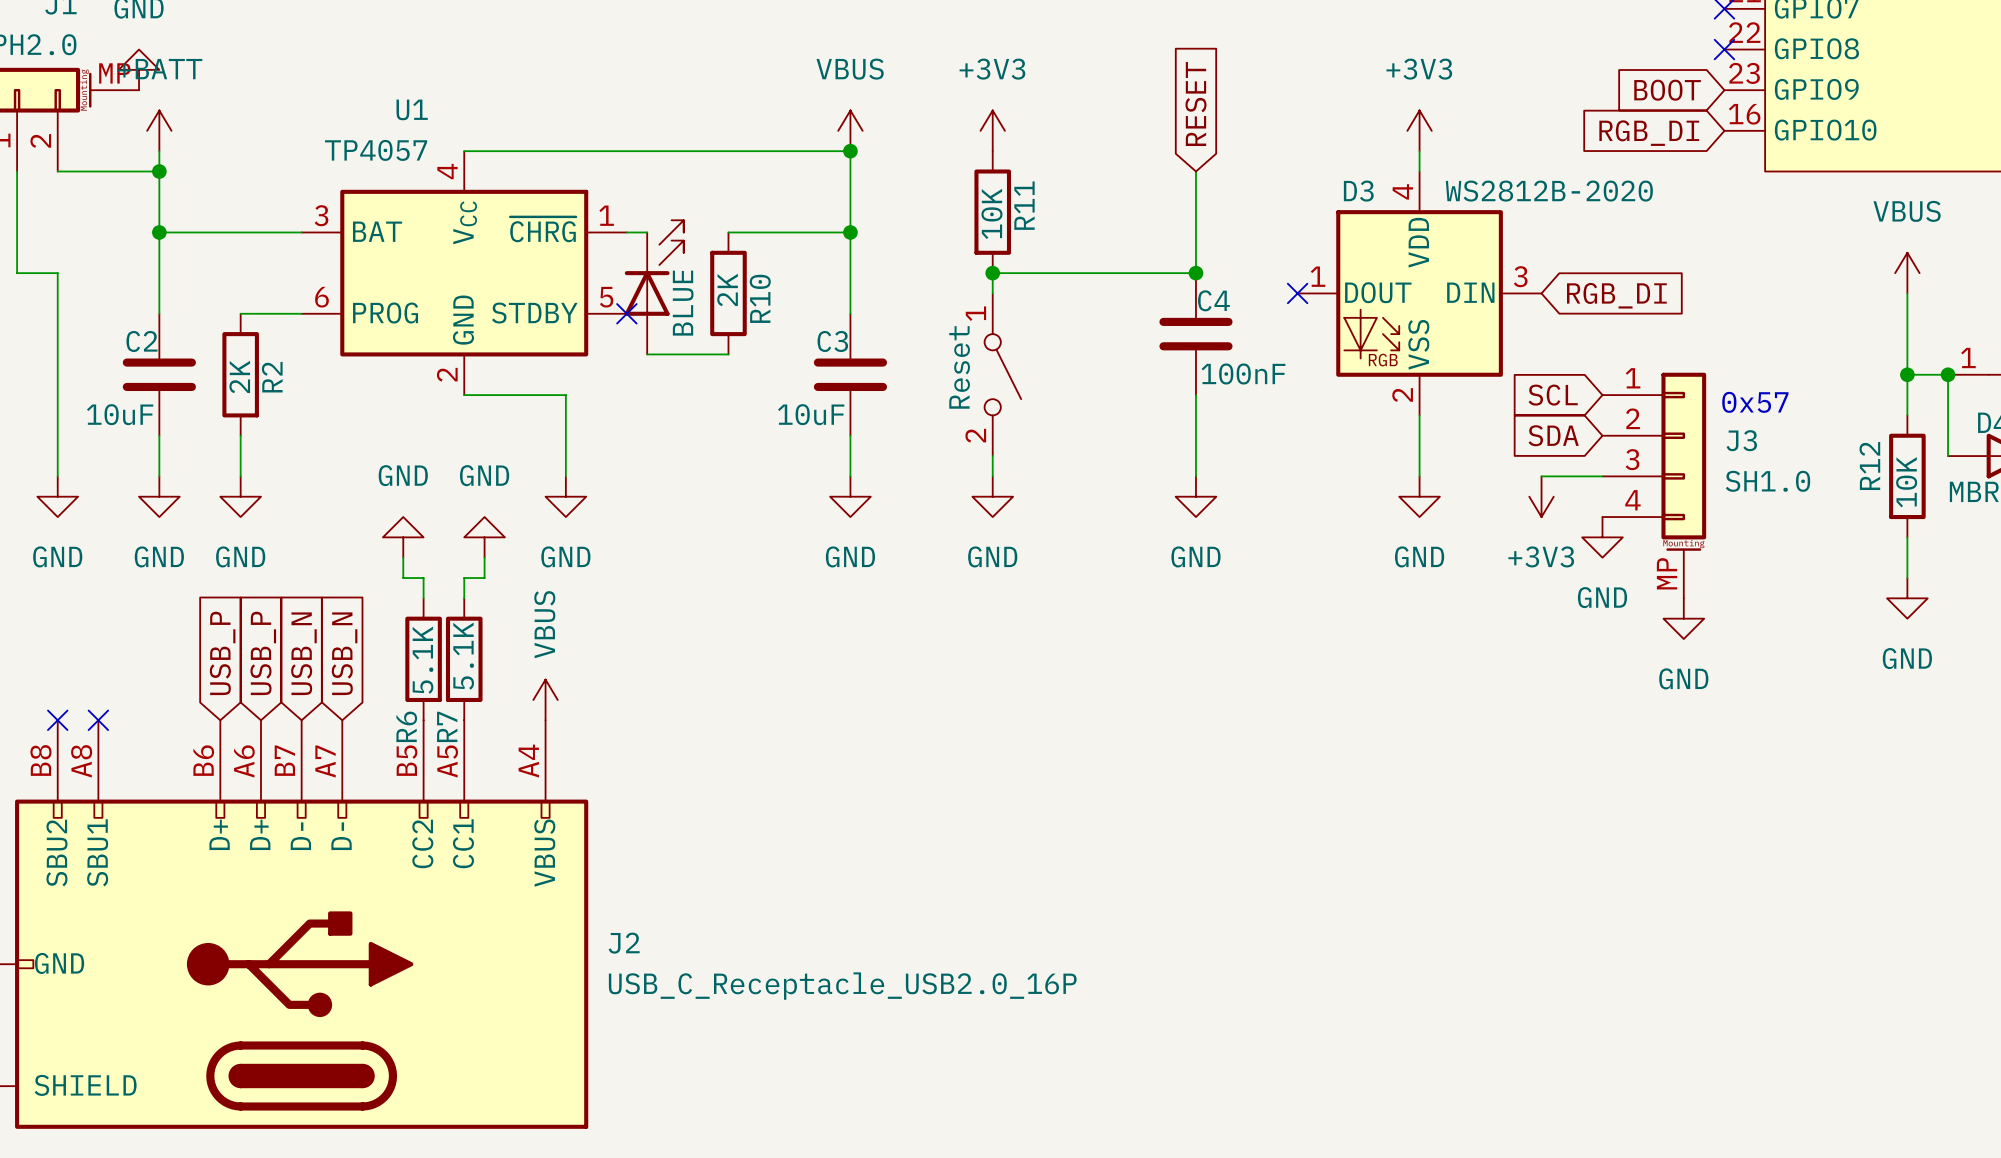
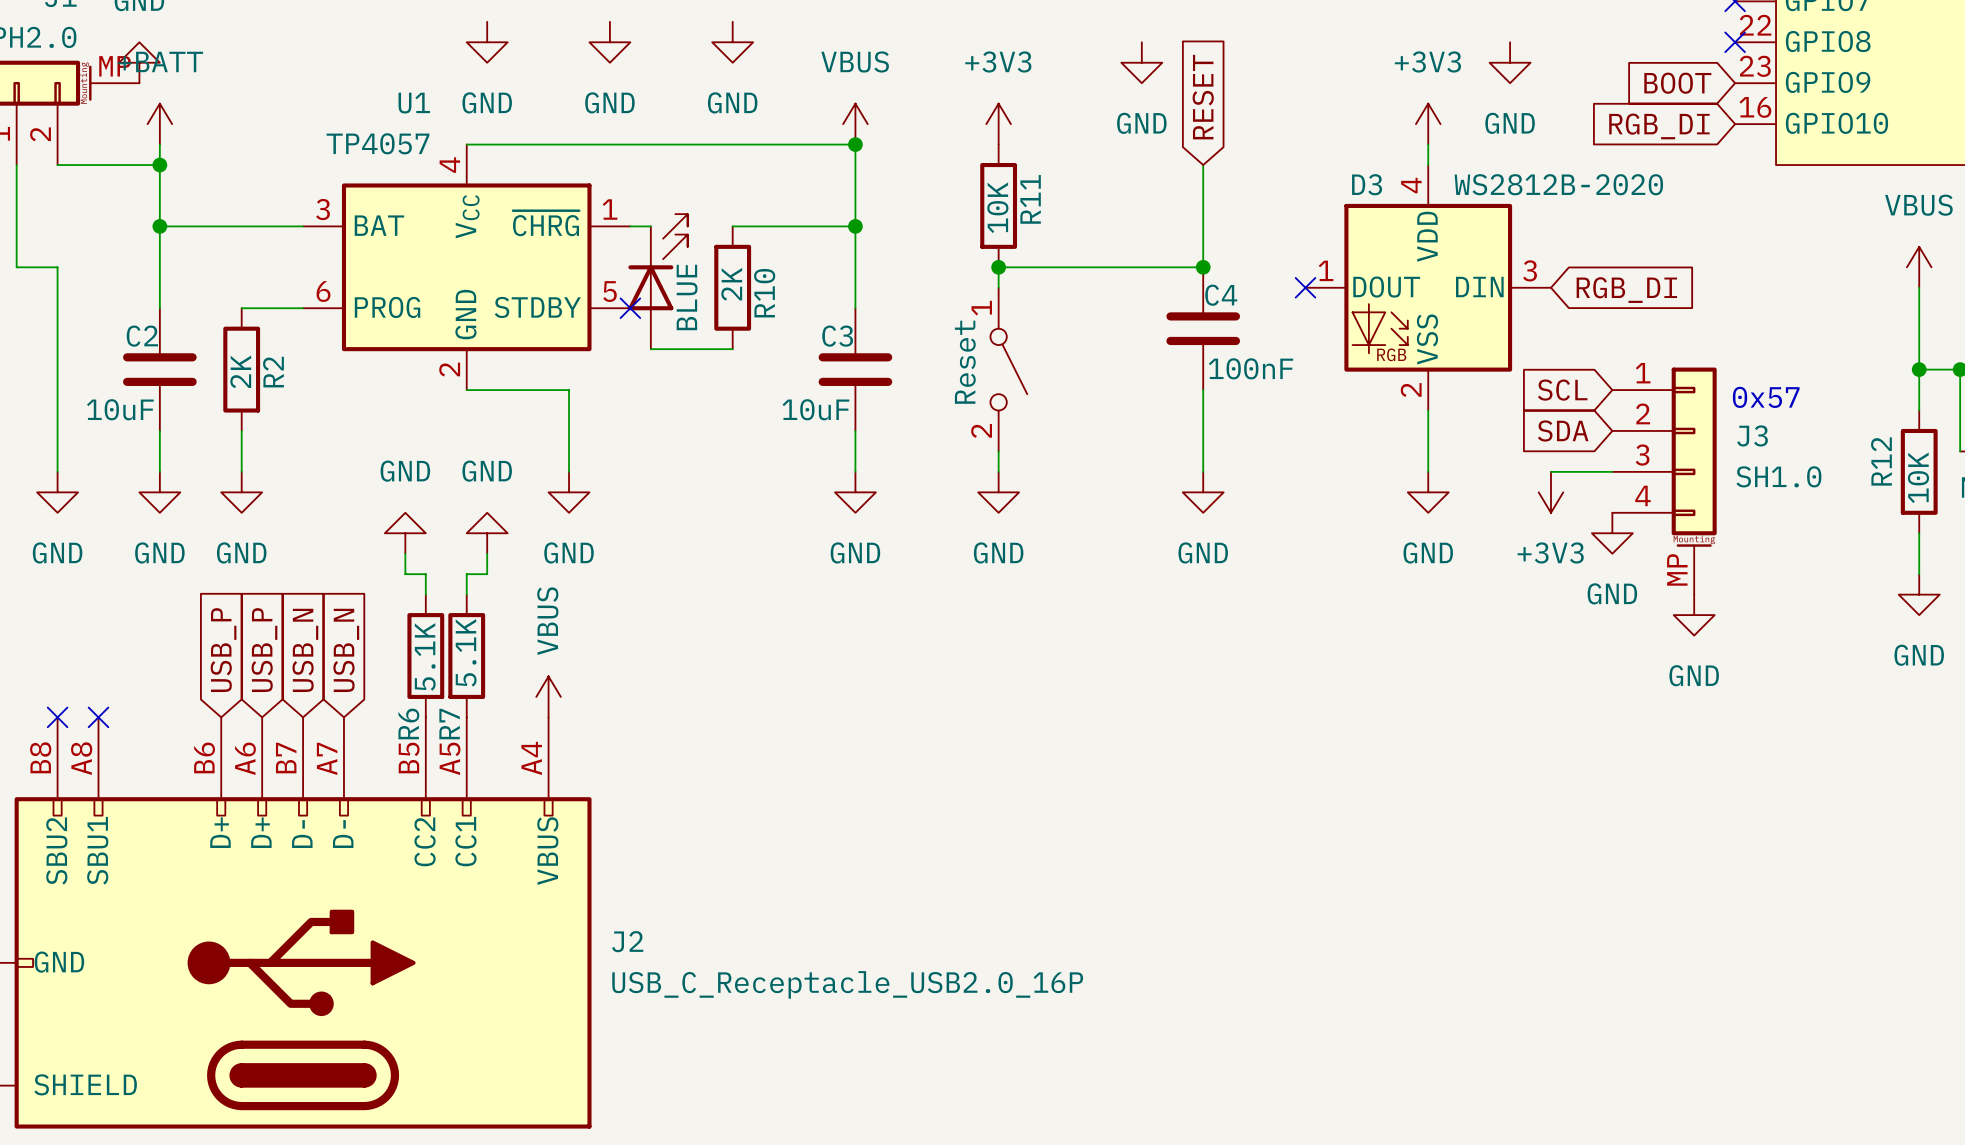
power symbol: none -> GND (487, 42)
power symbol: none -> GND (609, 42)
power symbol: none -> GND (732, 42)
power symbol: none -> GND (1141, 62)
power symbol: none -> GND (1510, 62)

